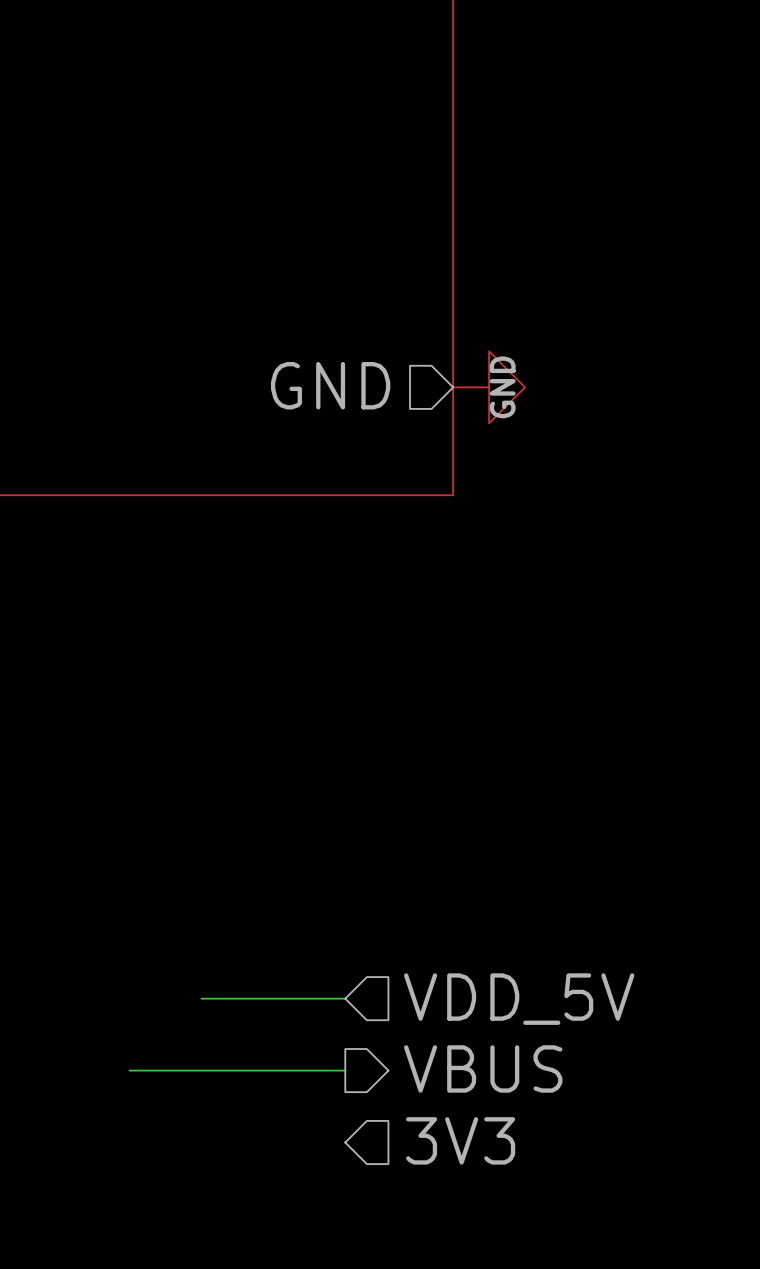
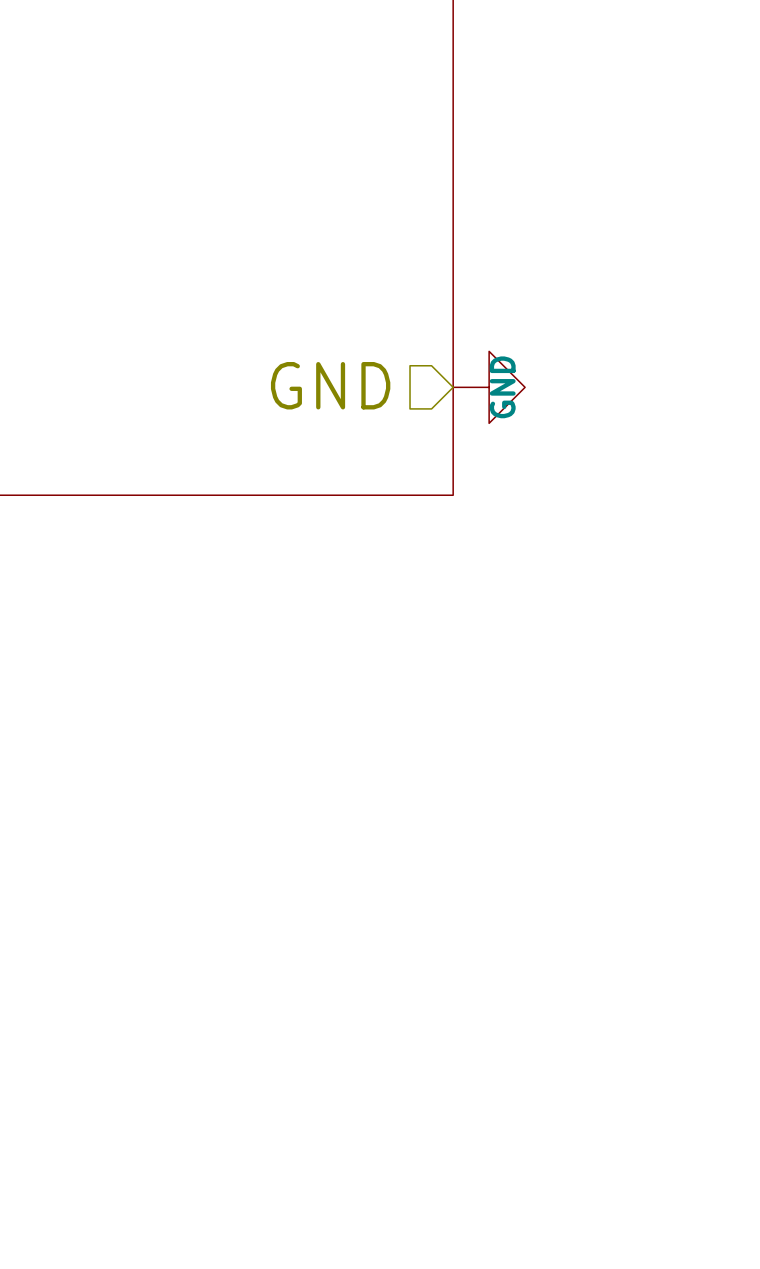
wire: (201, 998) (345, 998) -> none
hierarchical label: VDD_5V (519, 999) -> none
hierarchical label: VBUS (483, 1068) -> none
wire: (129, 1070) (345, 1070) -> none
hierarchical label: 3V3 (460, 1140) -> none

